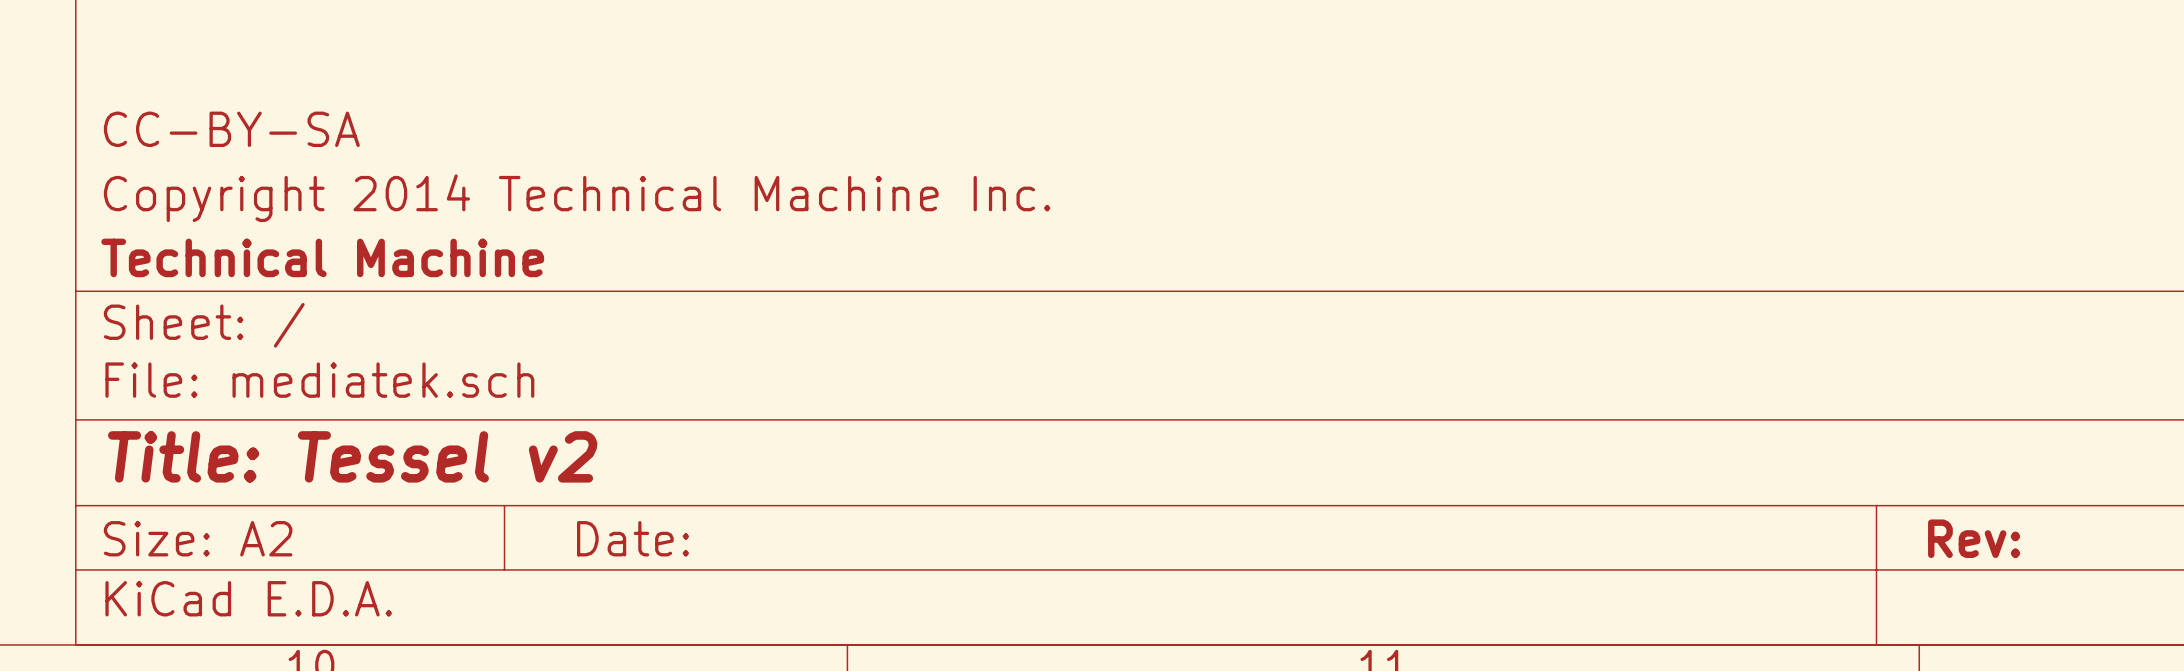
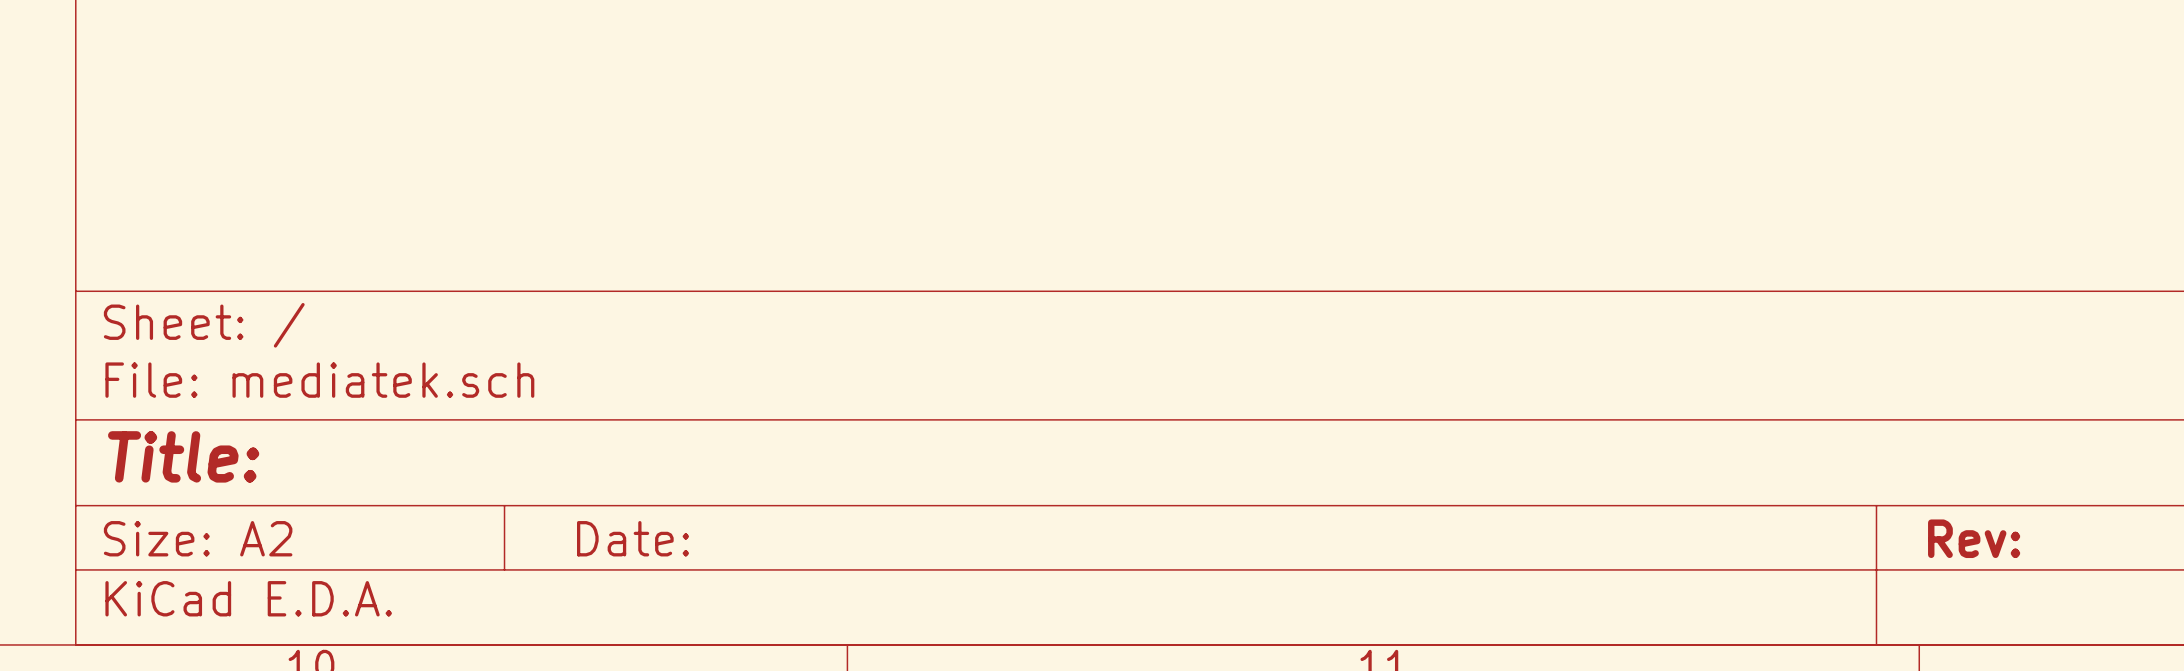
title block: CC-BY-SA (231, 129) -> none
title block: Copyright 2014 Technical Machine Inc. (577, 198) -> none
title block: Technical Machine (322, 257) -> none
title block: Title: Tessel v2 (352, 456) -> Title: (183, 456)

